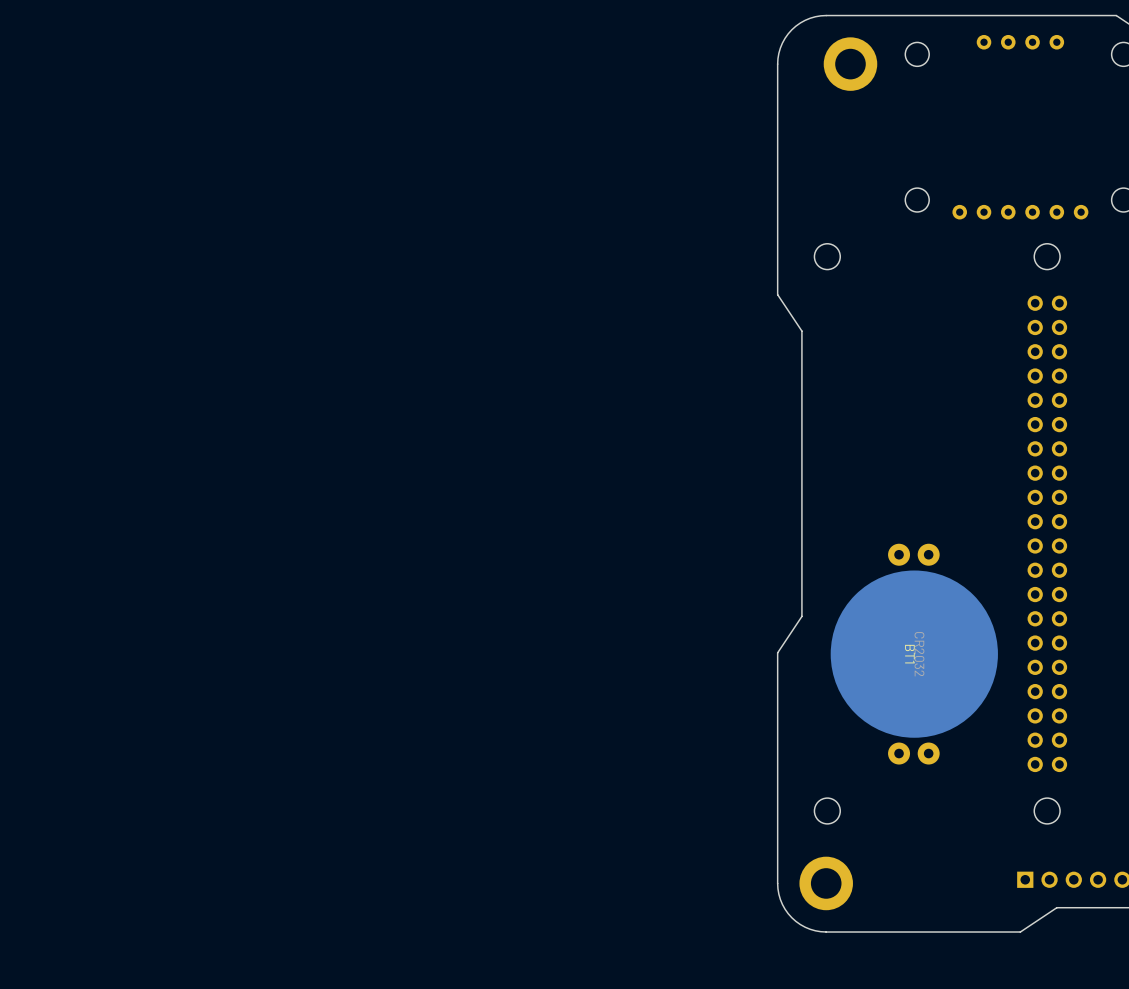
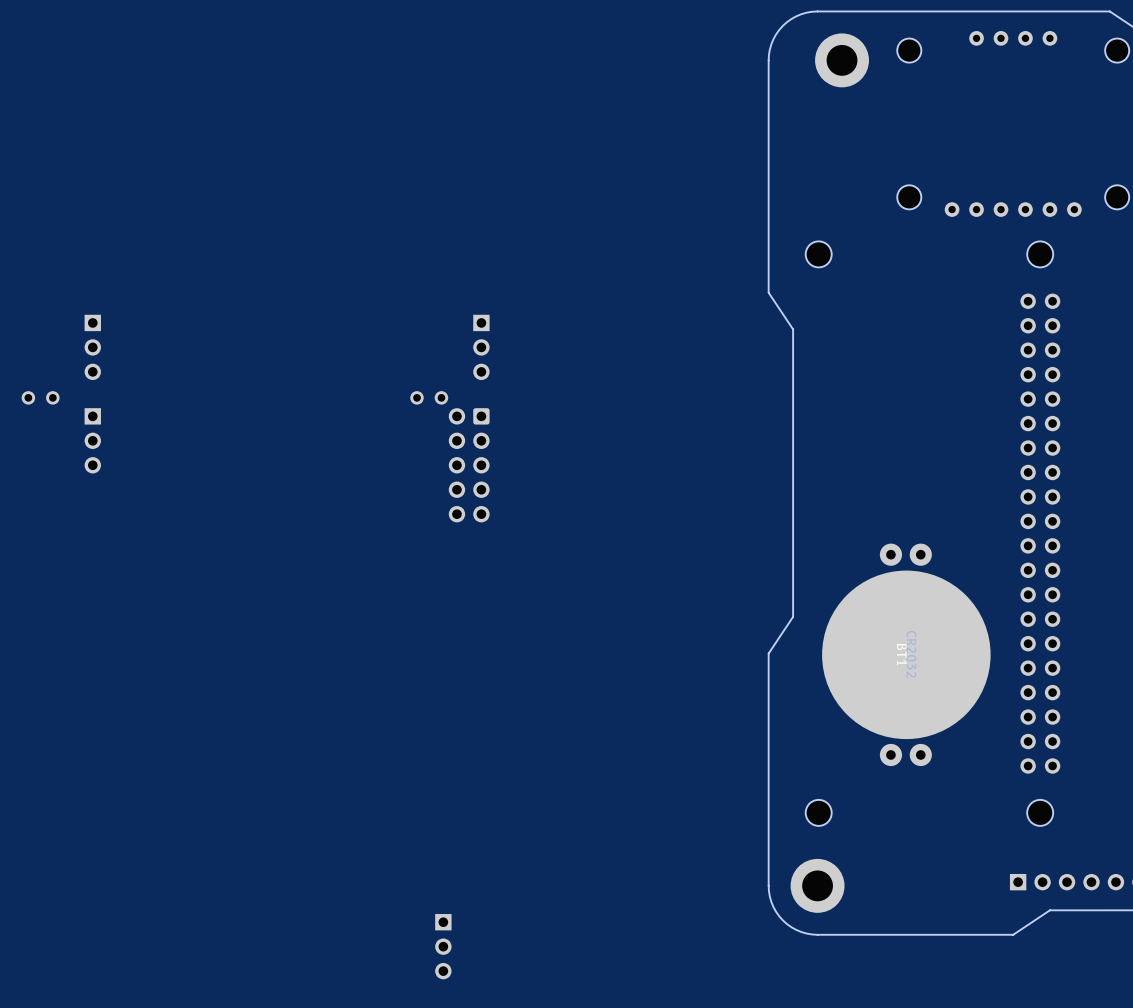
part: none -> (92, 347)
part: none -> (481, 347)
part: none -> (40, 397)
part: none -> (429, 397)
part: none -> (92, 440)
part: none -> (469, 465)
part: none -> (443, 946)

